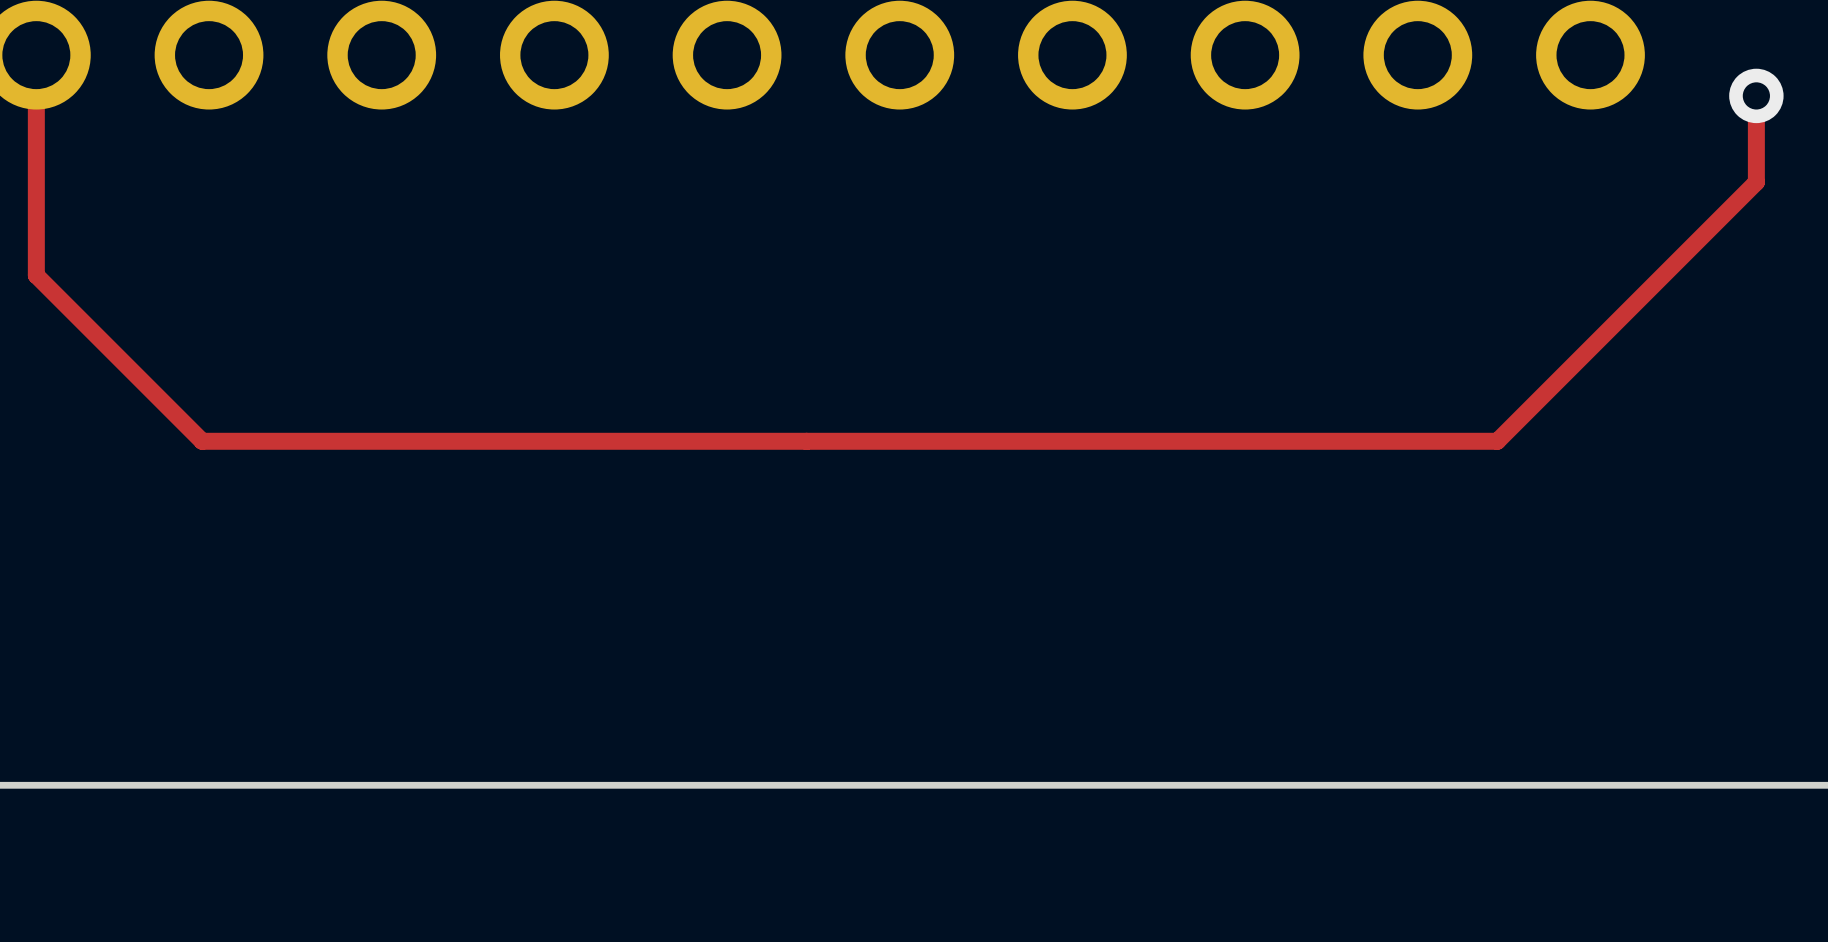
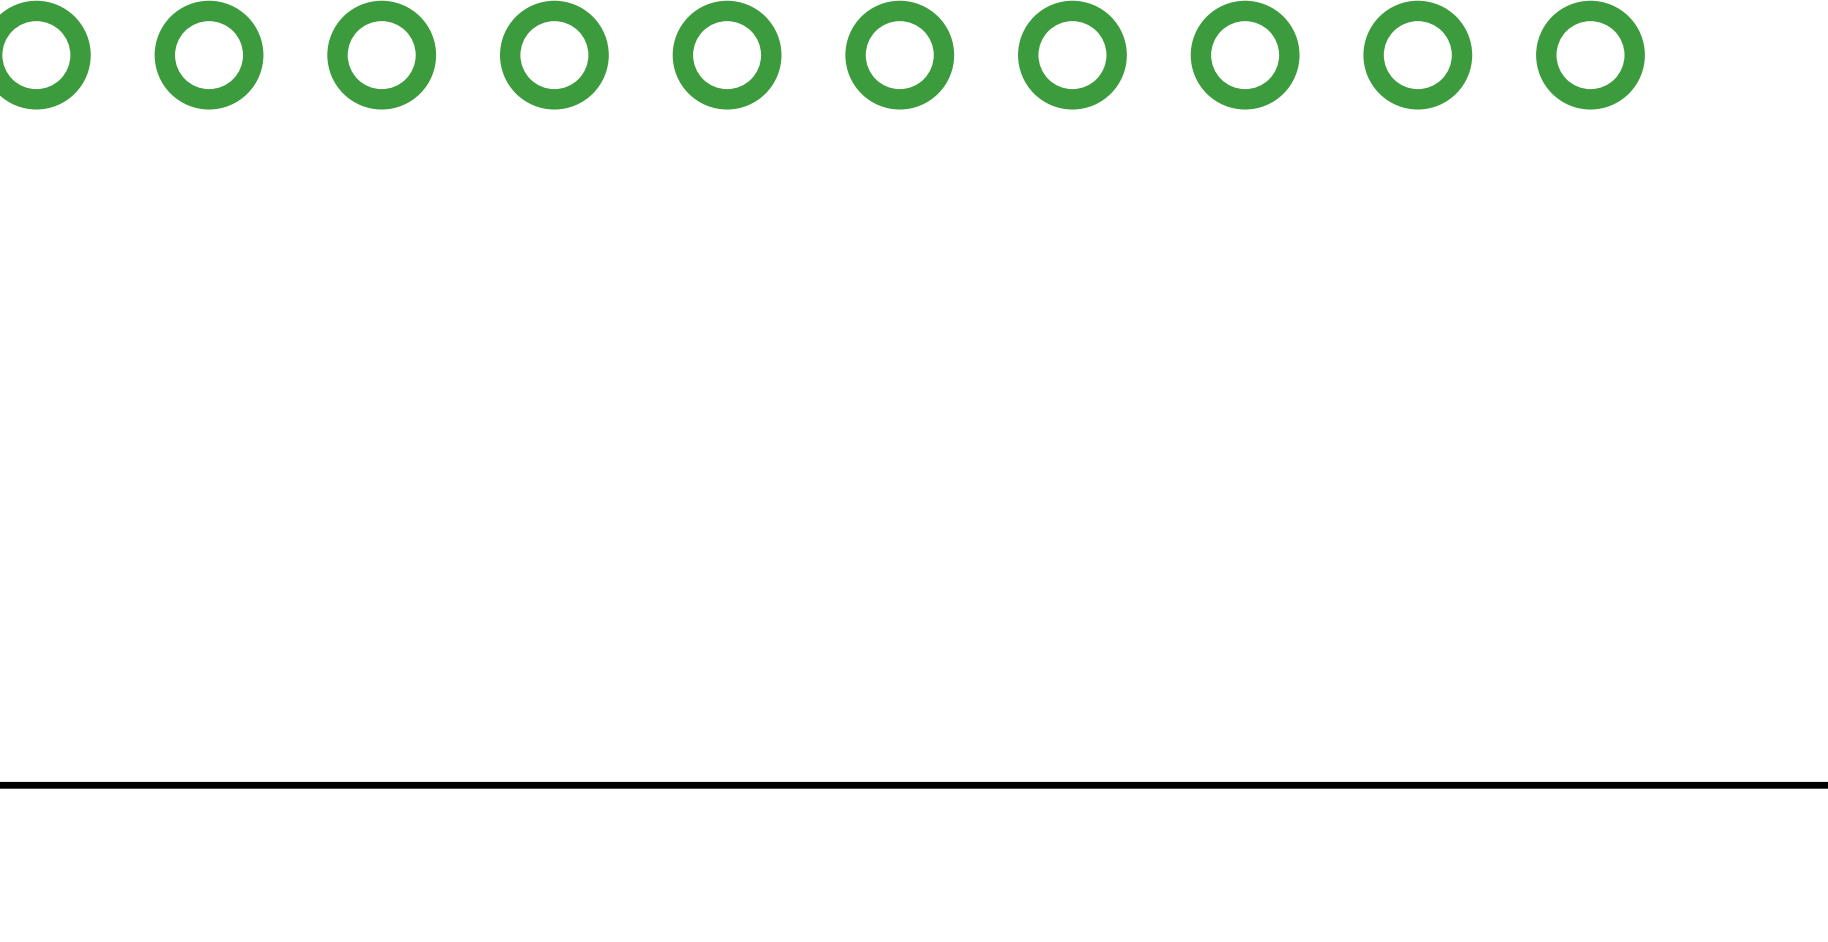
track: (36, 55) (36, 275) (202, 441) (1497, 441) (1756, 182) (1756, 95) -> none
via: (1756, 95) -> none

